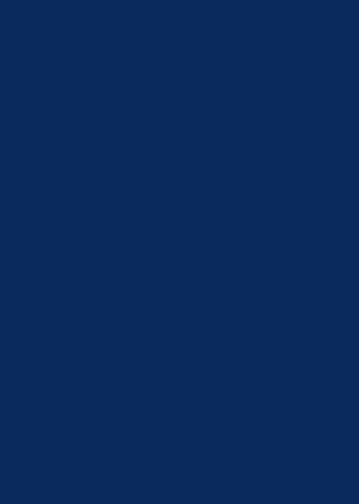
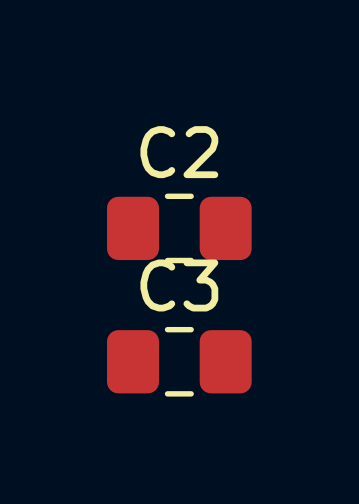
C2: none -> (179, 228)
C3: none -> (179, 361)

